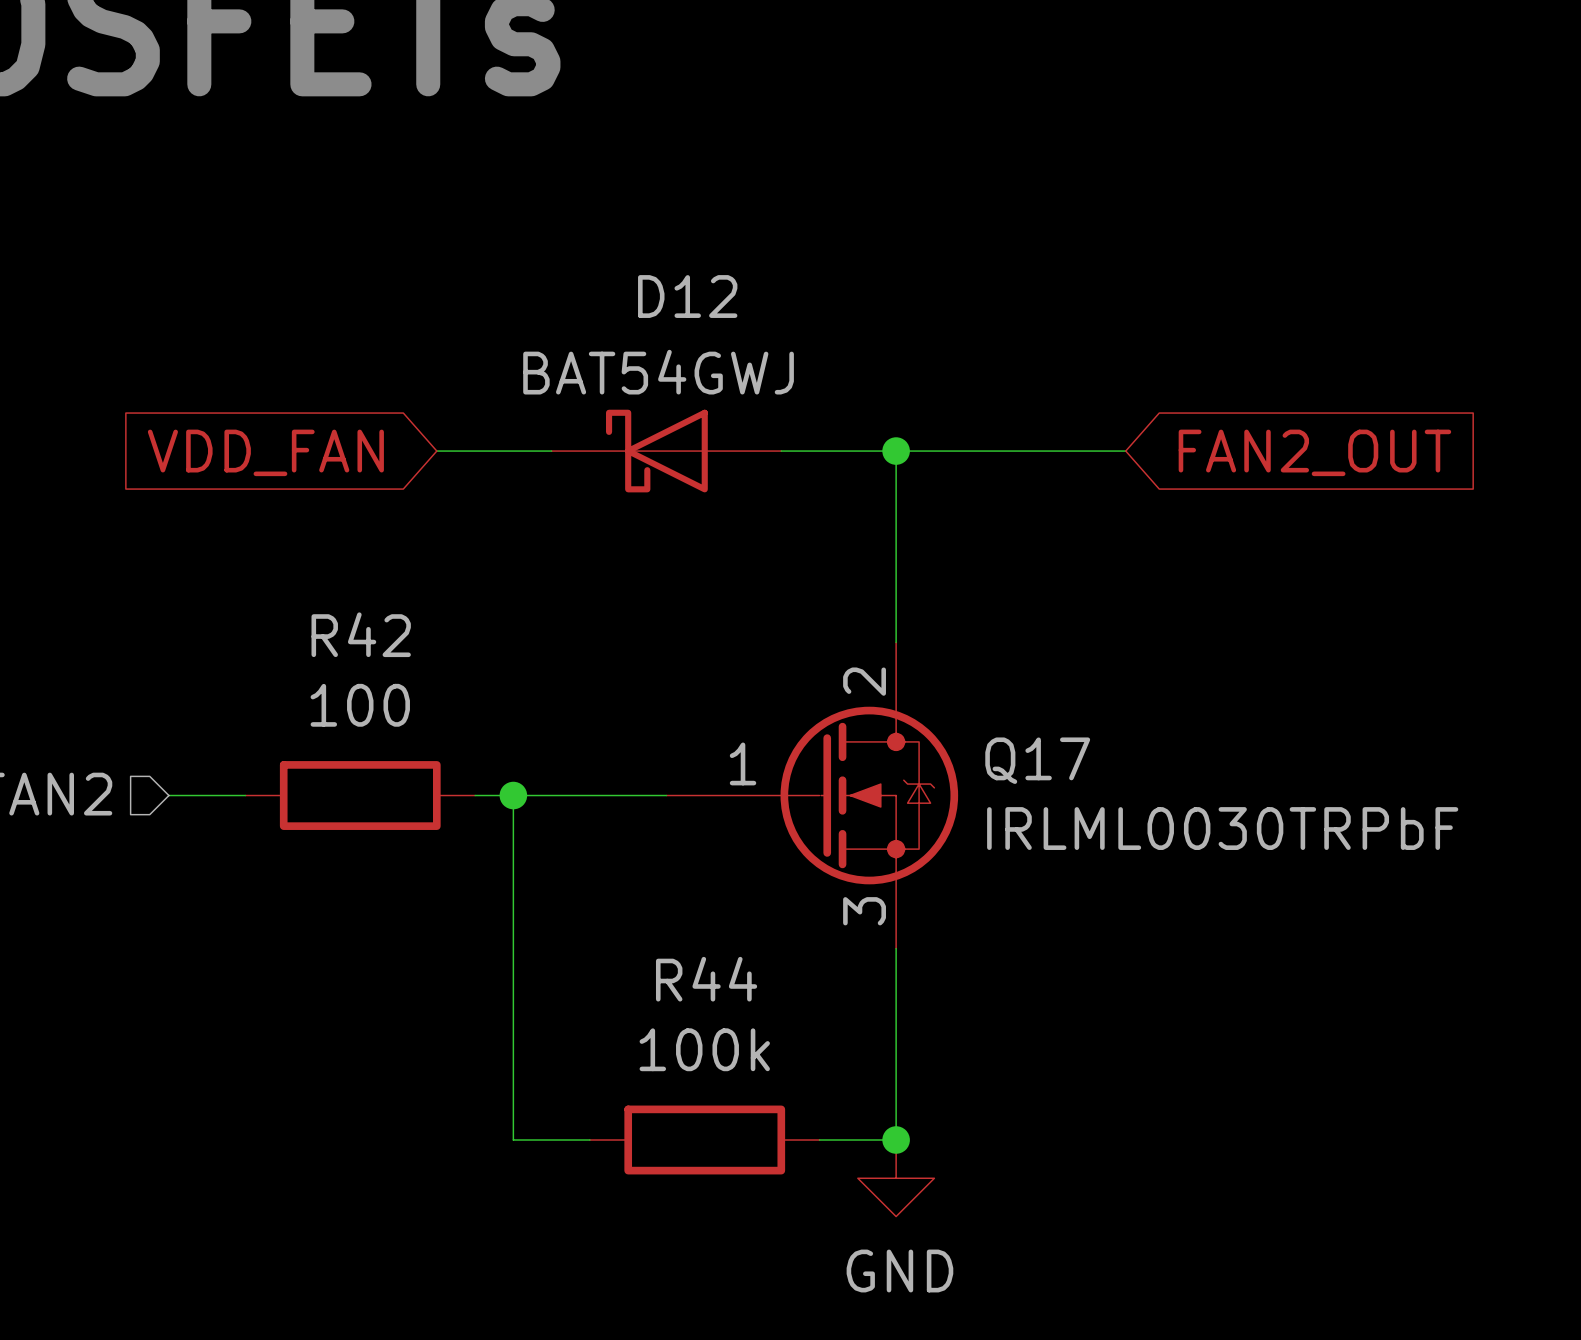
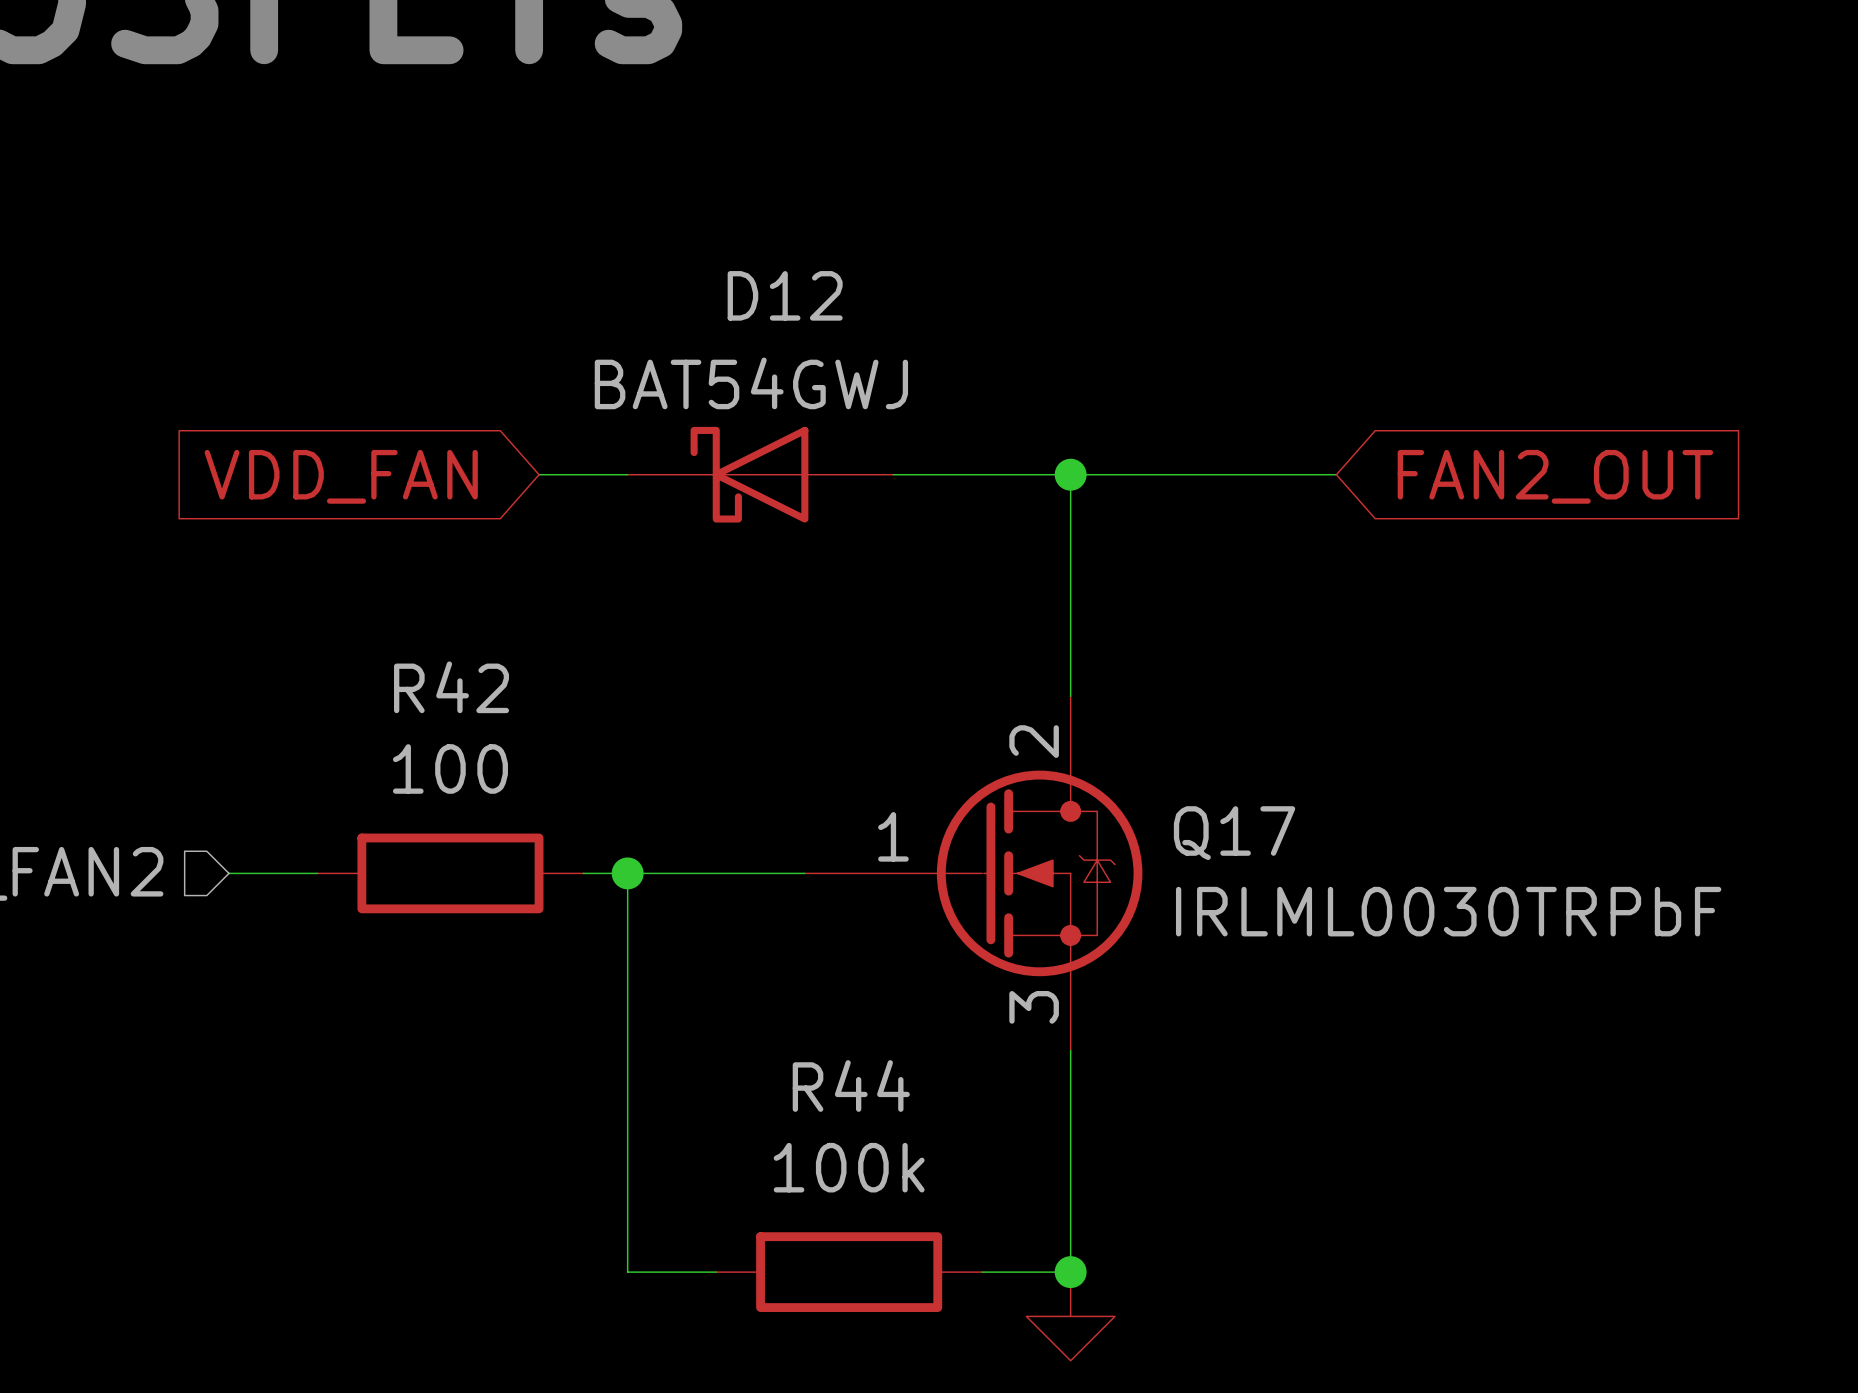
D12 position: (666, 451) -> (760, 474)

